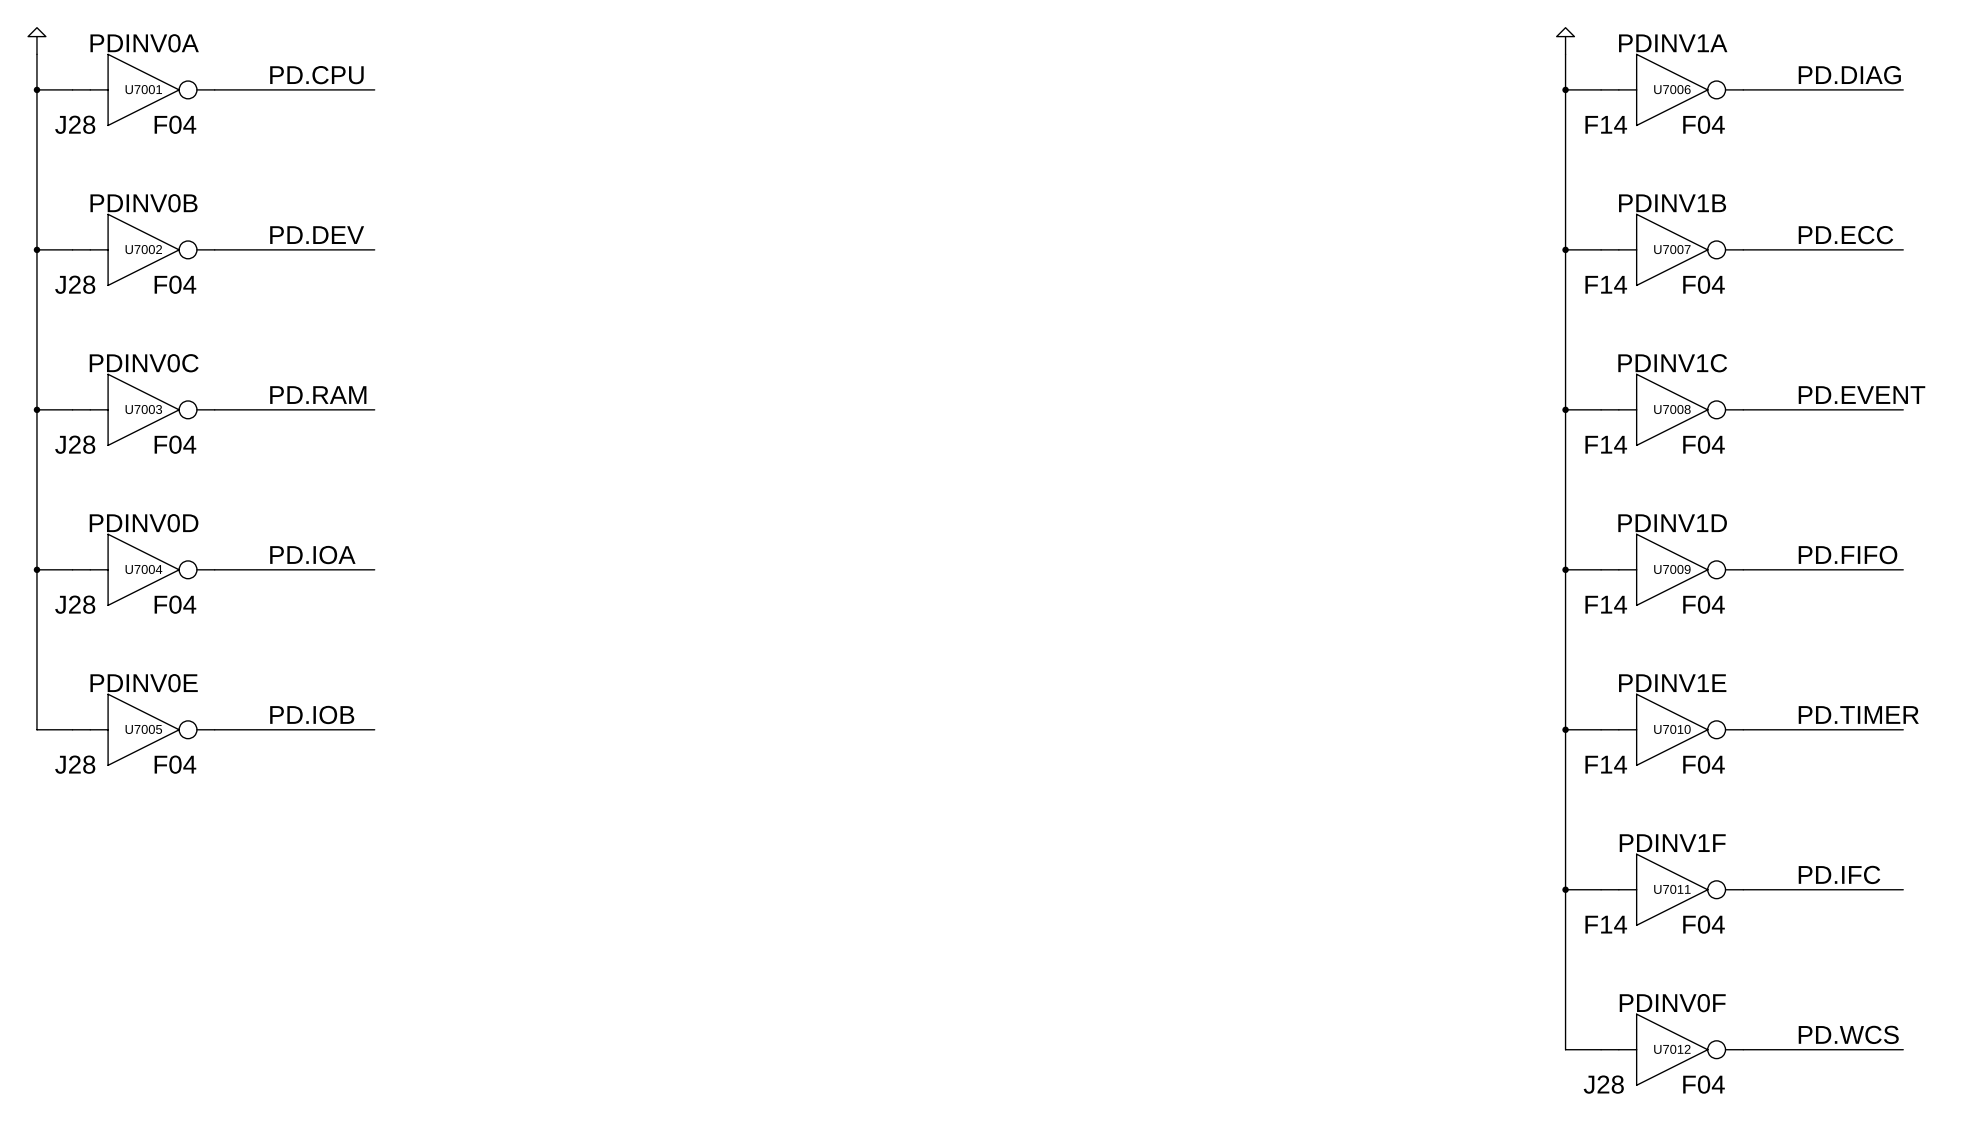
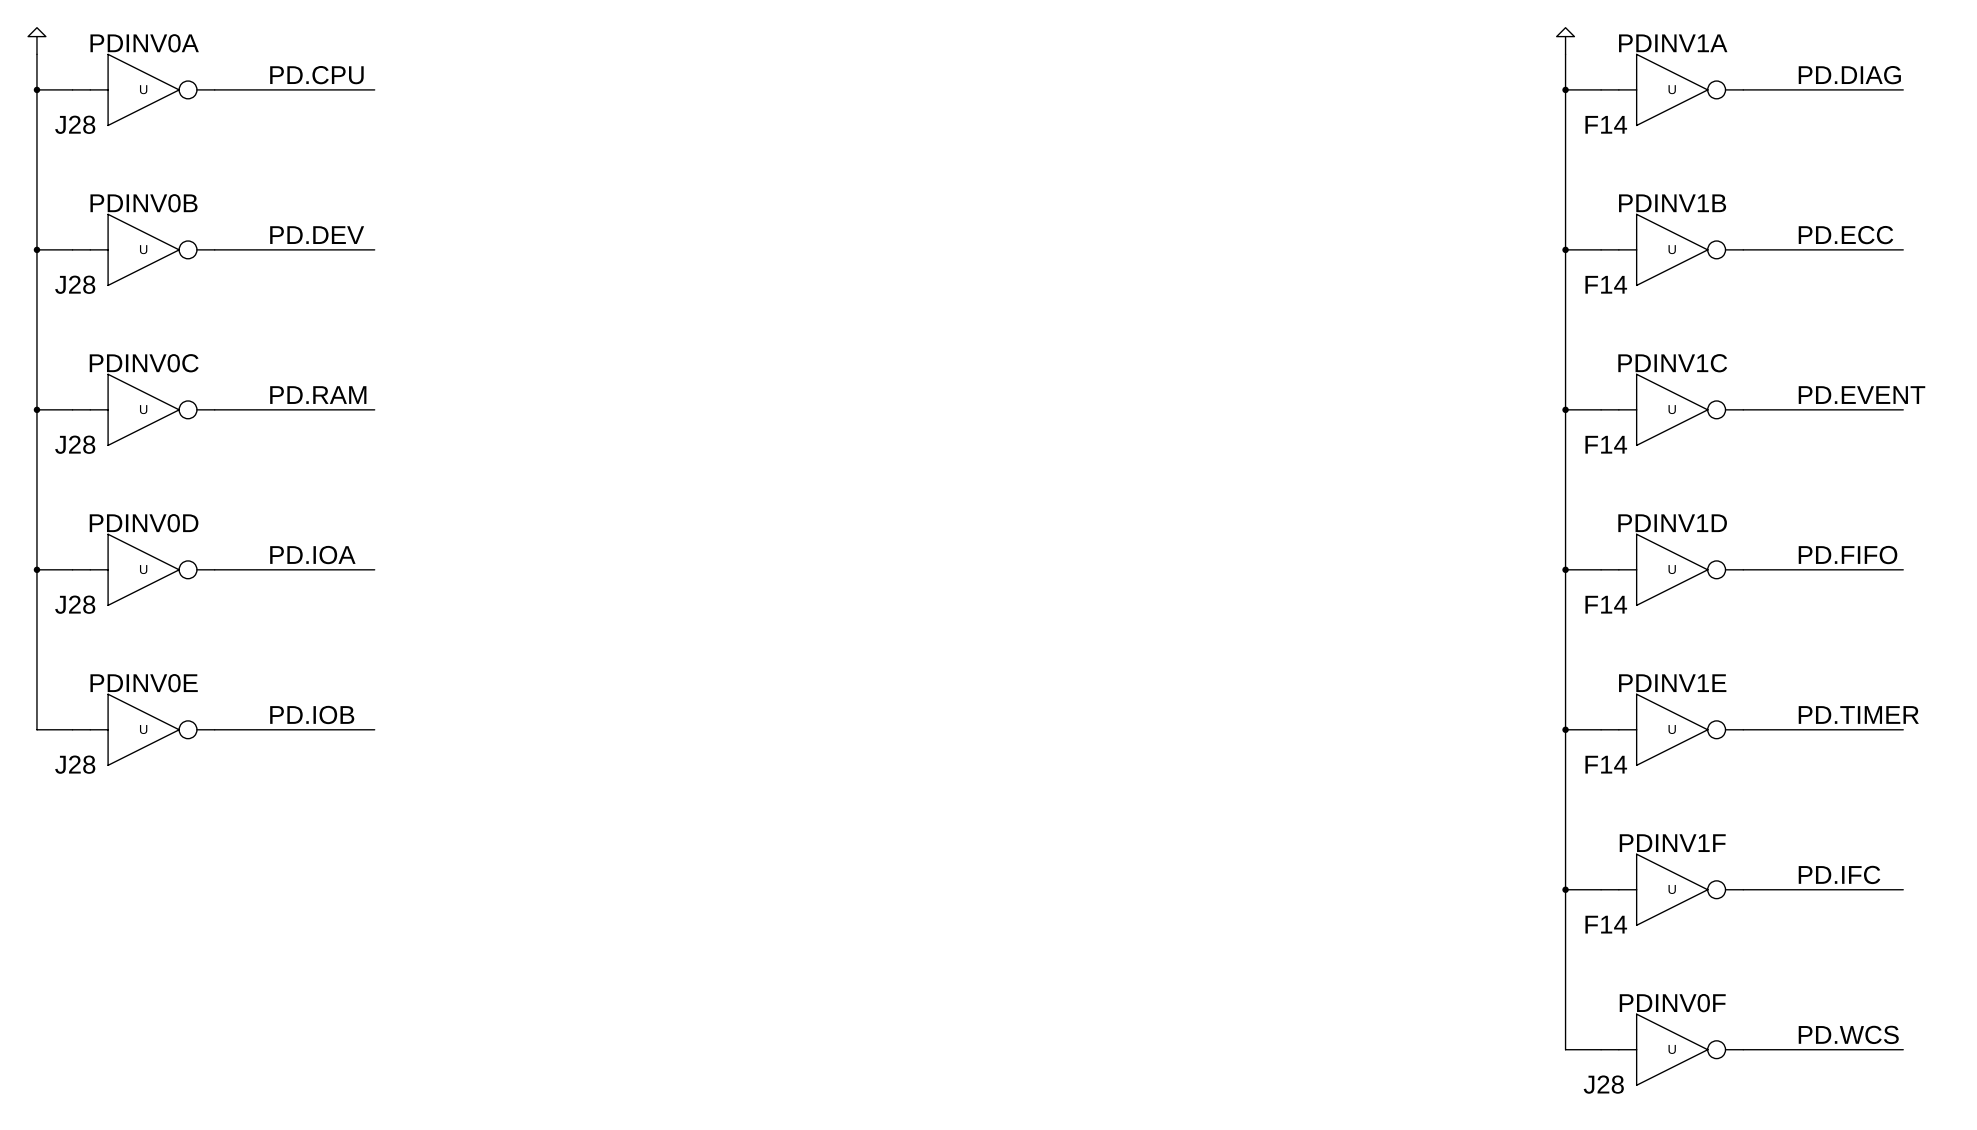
U7001 name: U7001 (143, 89) -> U (143, 89)
U7006 name: U7006 (1672, 89) -> U (1672, 89)
U7001 value: F04 (175, 124) -> none
U7006 value: F04 (1704, 124) -> none
U7002 name: U7002 (143, 249) -> U (143, 249)
U7007 name: U7007 (1672, 249) -> U (1672, 249)
U7002 value: F04 (175, 284) -> none
U7007 value: F04 (1704, 284) -> none
U7003 name: U7003 (143, 409) -> U (143, 409)
U7008 name: U7008 (1672, 409) -> U (1672, 409)
U7003 value: F04 (175, 444) -> none
U7008 value: F04 (1704, 444) -> none
U7004 name: U7004 (143, 569) -> U (143, 569)
U7009 name: U7009 (1672, 569) -> U (1672, 569)
U7004 value: F04 (175, 604) -> none
U7009 value: F04 (1704, 604) -> none
U7005 name: U7005 (143, 729) -> U (143, 729)
U7010 name: U7010 (1672, 729) -> U (1672, 729)
U7005 value: F04 (175, 764) -> none
U7010 value: F04 (1704, 764) -> none
U7011 name: U7011 (1672, 889) -> U (1672, 889)
U7011 value: F04 (1704, 924) -> none
U7012 name: U7012 (1672, 1049) -> U (1672, 1049)
U7012 value: F04 (1704, 1084) -> none

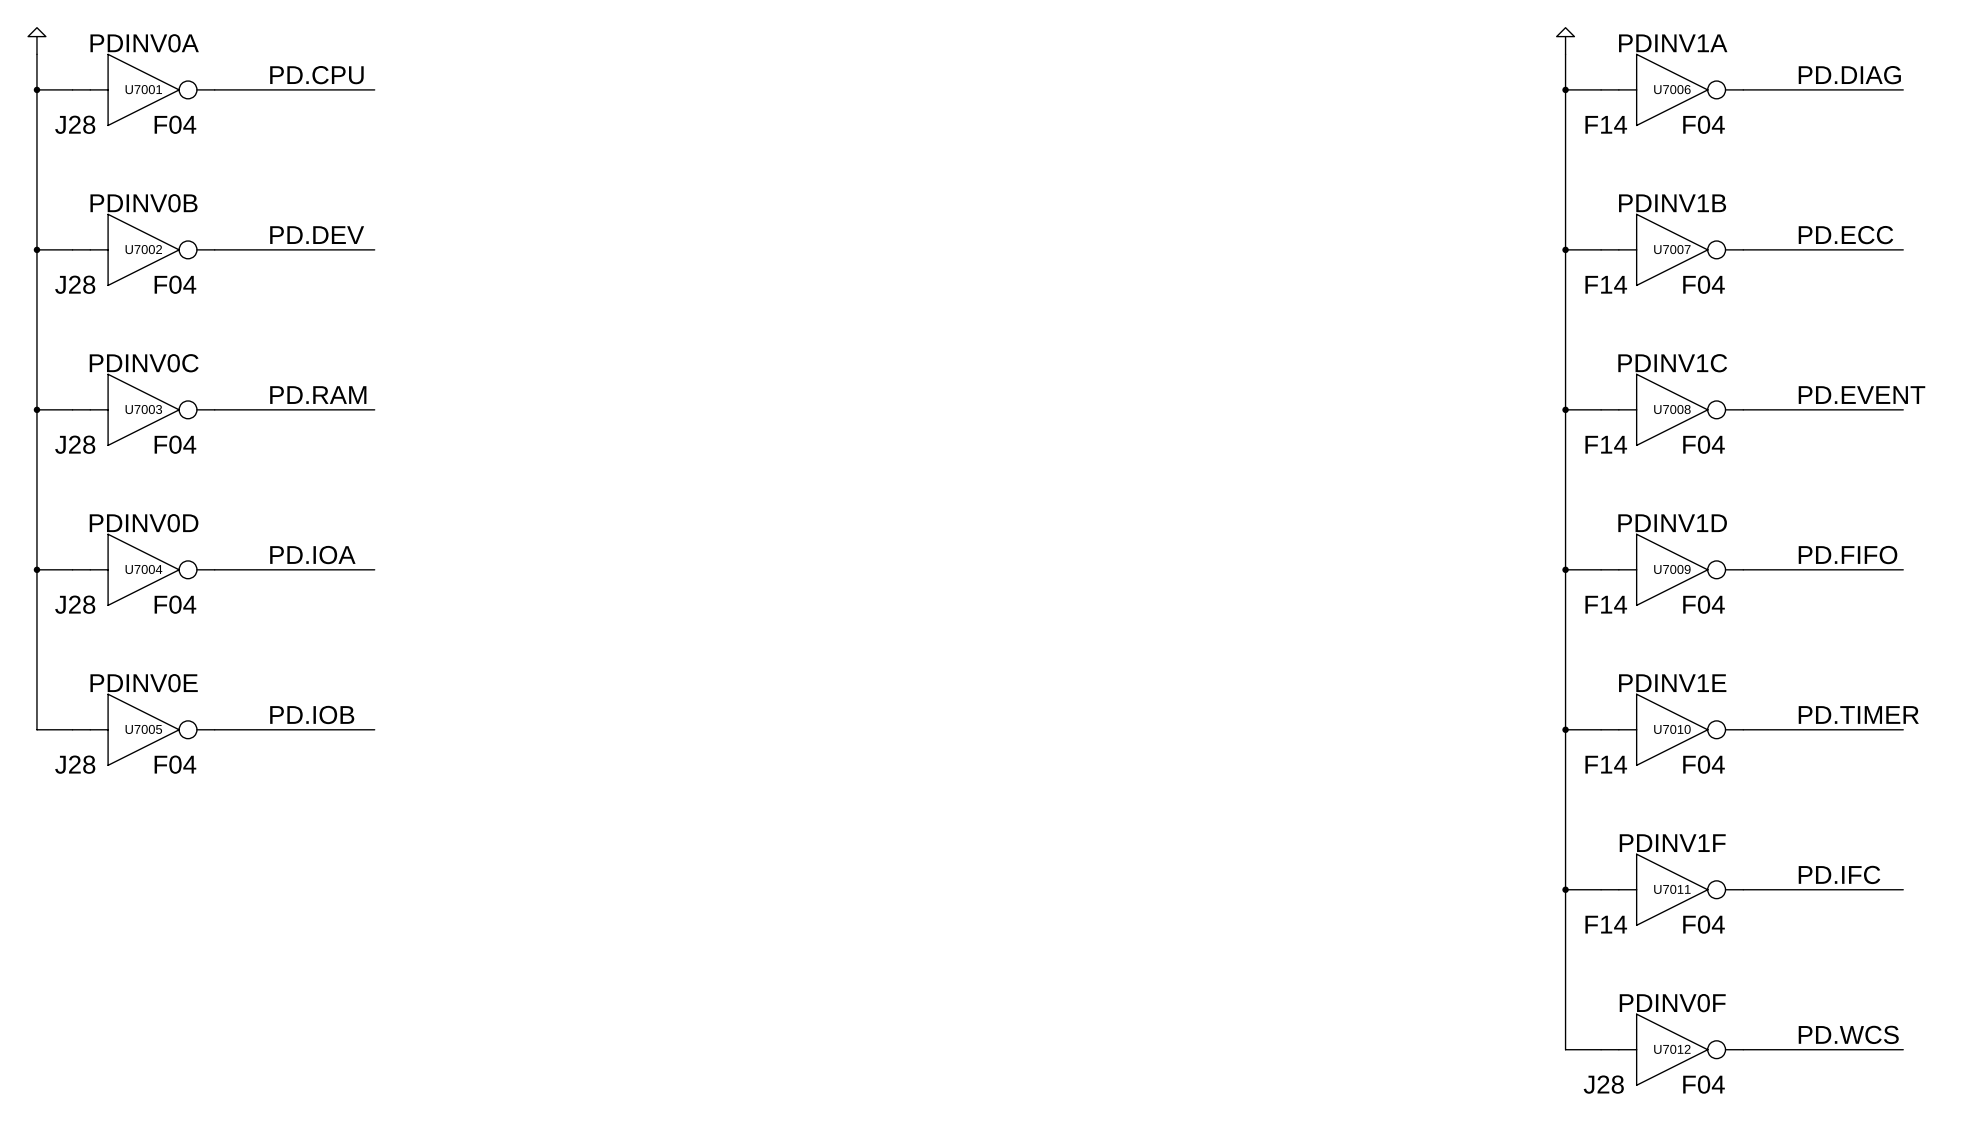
U name: U (143, 89) -> U7001 (143, 89)
U name: U (1672, 89) -> U7006 (1672, 89)
U value: none -> F04 (175, 124)
U value: none -> F04 (1704, 124)
U name: U (143, 249) -> U7002 (143, 249)
U name: U (1672, 249) -> U7007 (1672, 249)
U value: none -> F04 (175, 284)
U value: none -> F04 (1704, 284)
U name: U (143, 409) -> U7003 (143, 409)
U name: U (1672, 409) -> U7008 (1672, 409)
U value: none -> F04 (175, 444)
U value: none -> F04 (1704, 444)
U name: U (143, 569) -> U7004 (143, 569)
U name: U (1672, 569) -> U7009 (1672, 569)
U value: none -> F04 (175, 604)
U value: none -> F04 (1704, 604)
U name: U (143, 729) -> U7005 (143, 729)
U name: U (1672, 729) -> U7010 (1672, 729)
U value: none -> F04 (175, 764)
U value: none -> F04 (1704, 764)
U name: U (1672, 889) -> U7011 (1672, 889)
U value: none -> F04 (1704, 924)
U name: U (1672, 1049) -> U7012 (1672, 1049)
U value: none -> F04 (1704, 1084)

